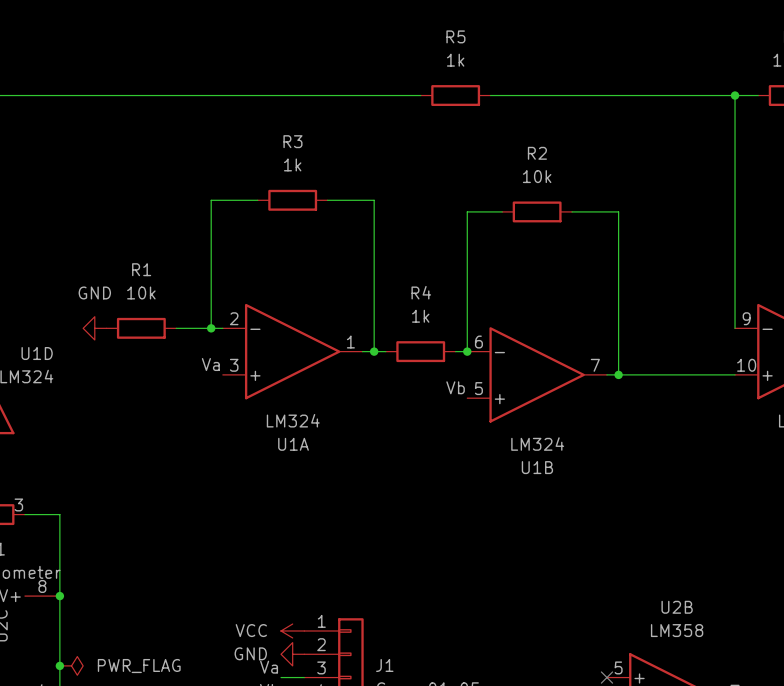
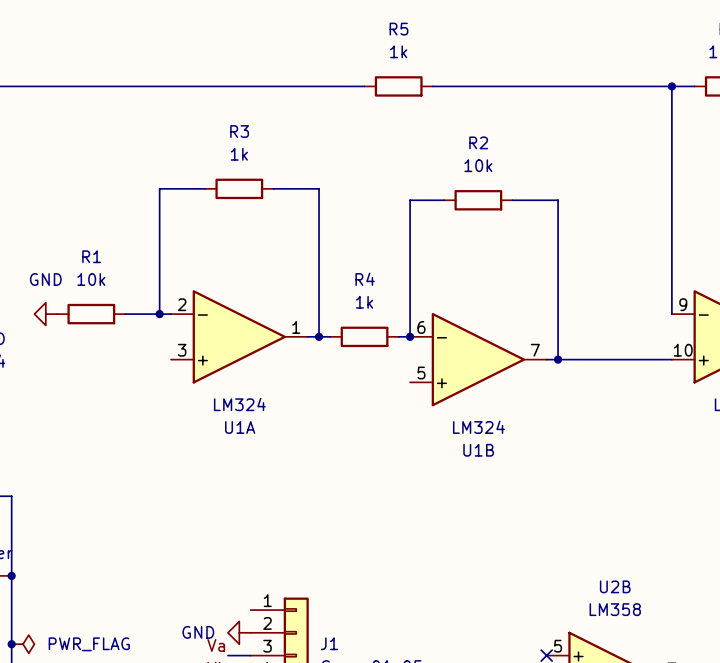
label: Va (210, 364) -> none
label: Vb (455, 387) -> none
power symbol: VCC (292, 630) -> none

